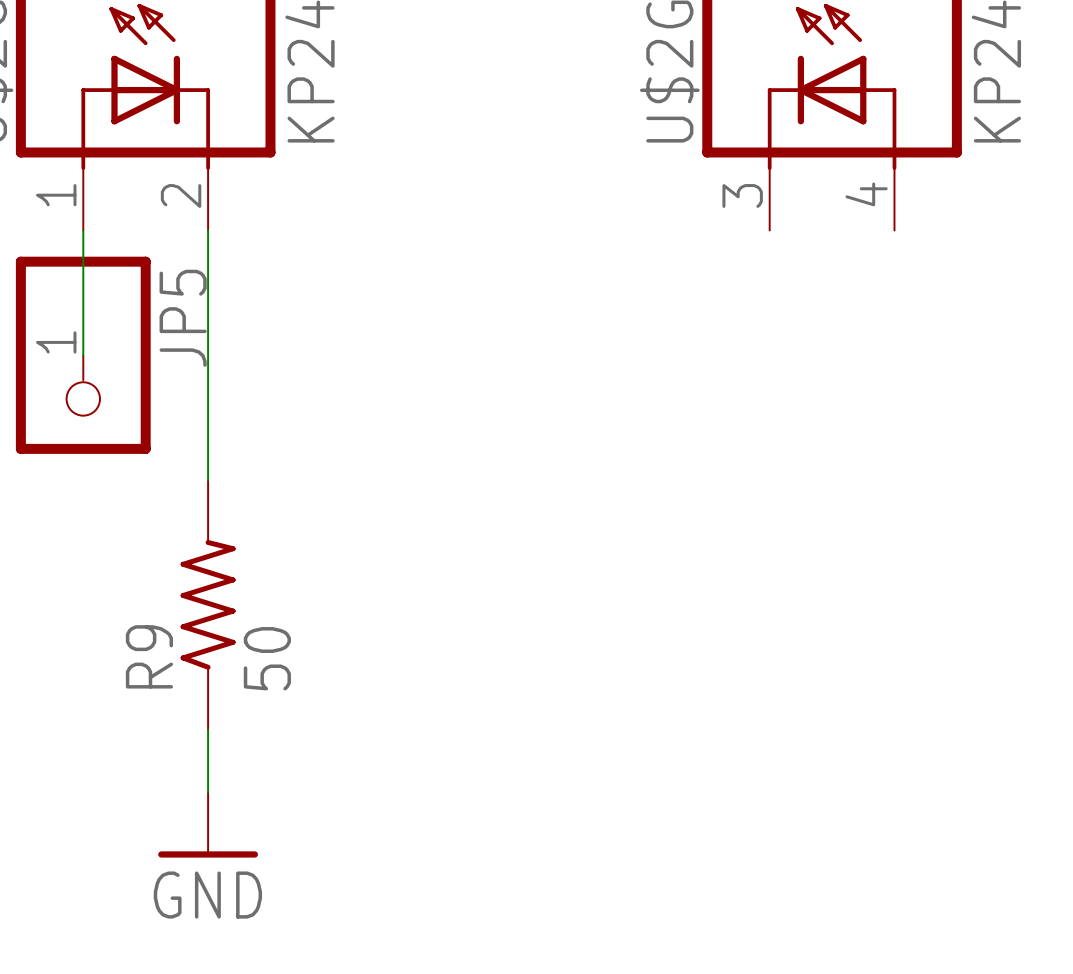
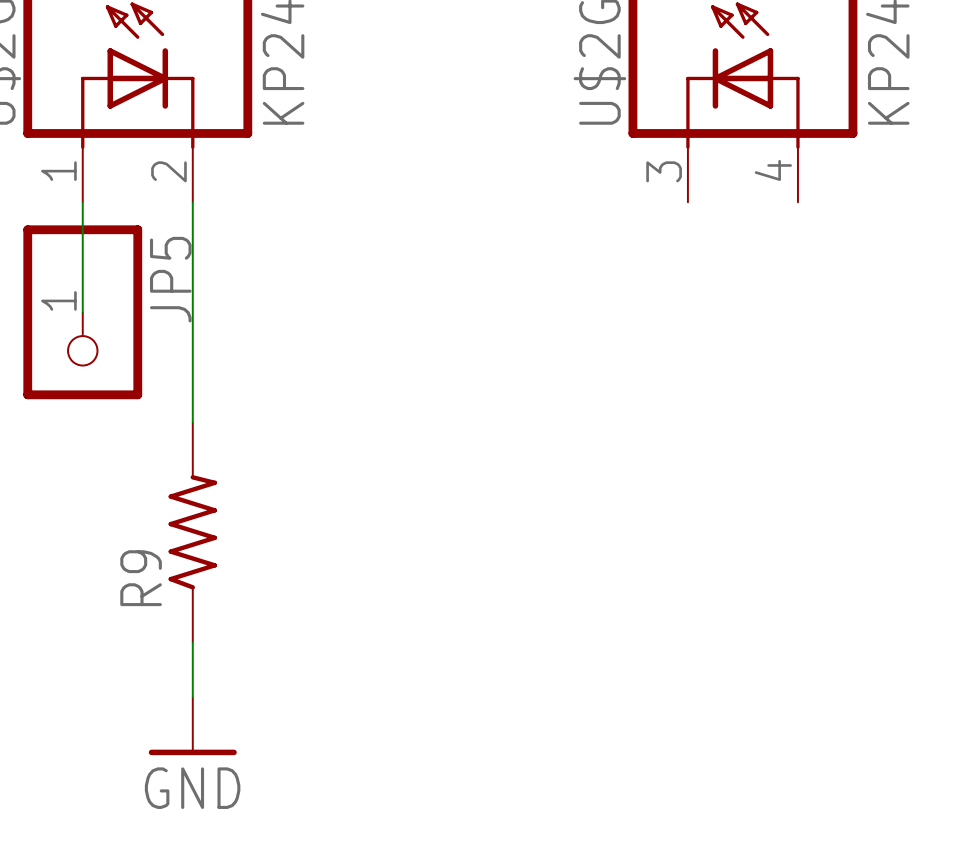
R9 value: 50 (267, 658) -> none

